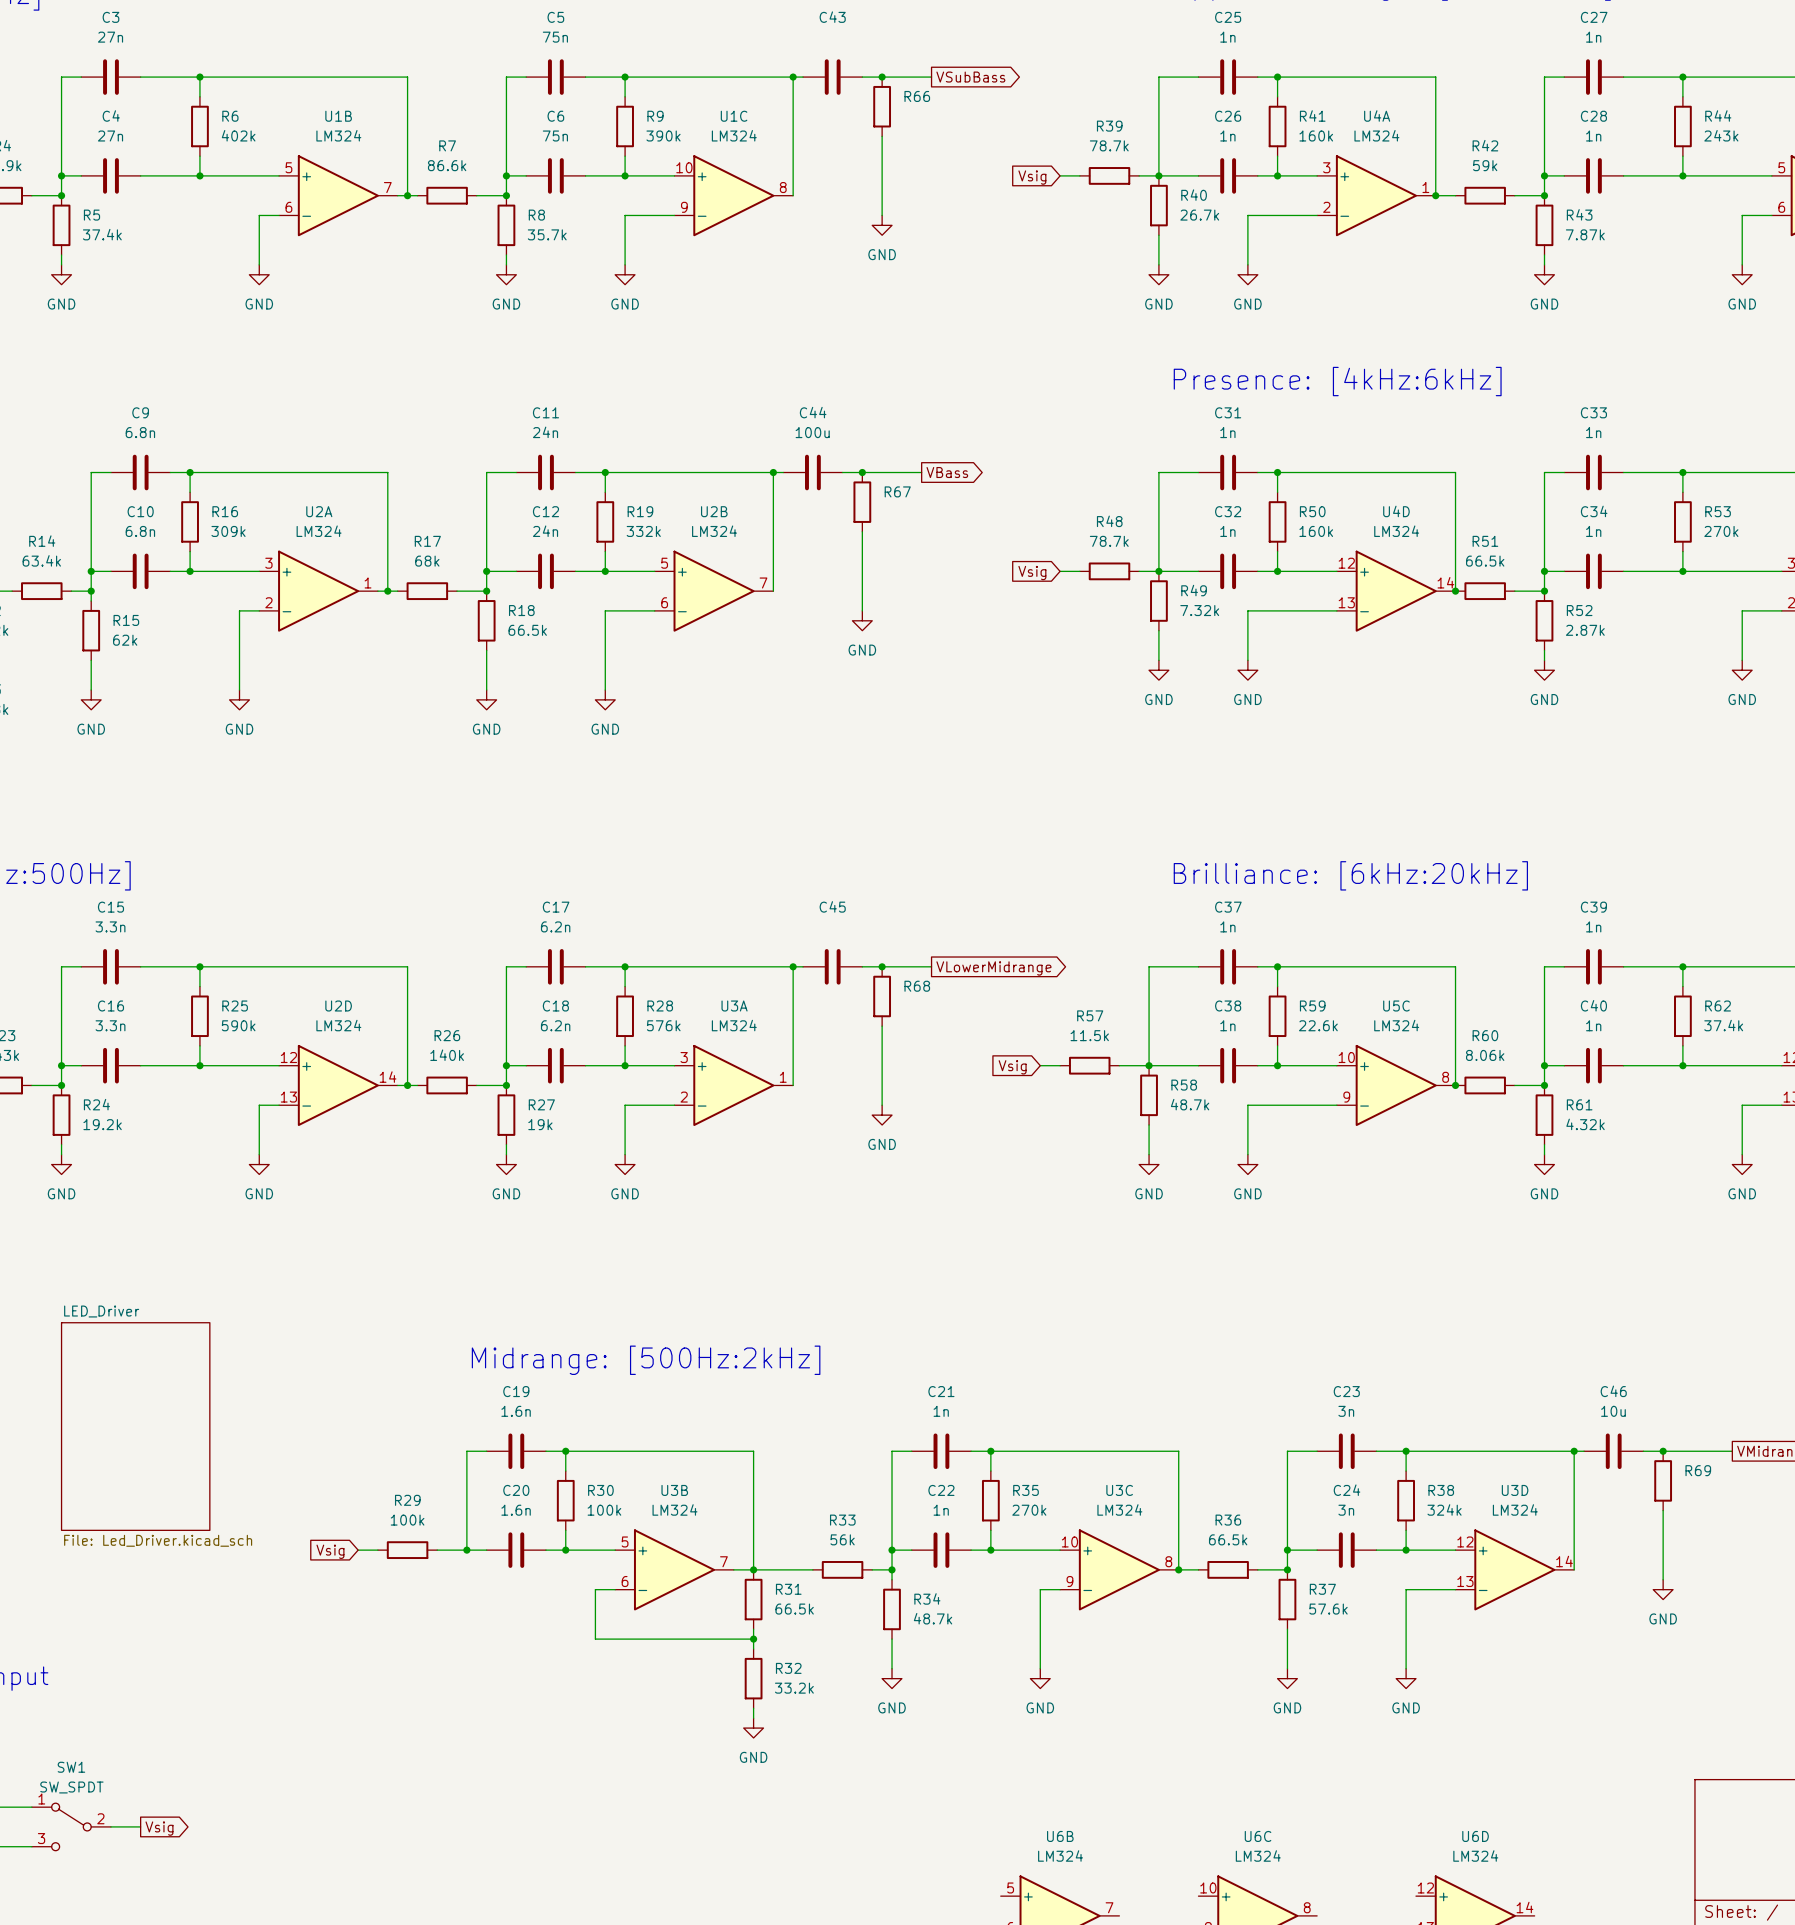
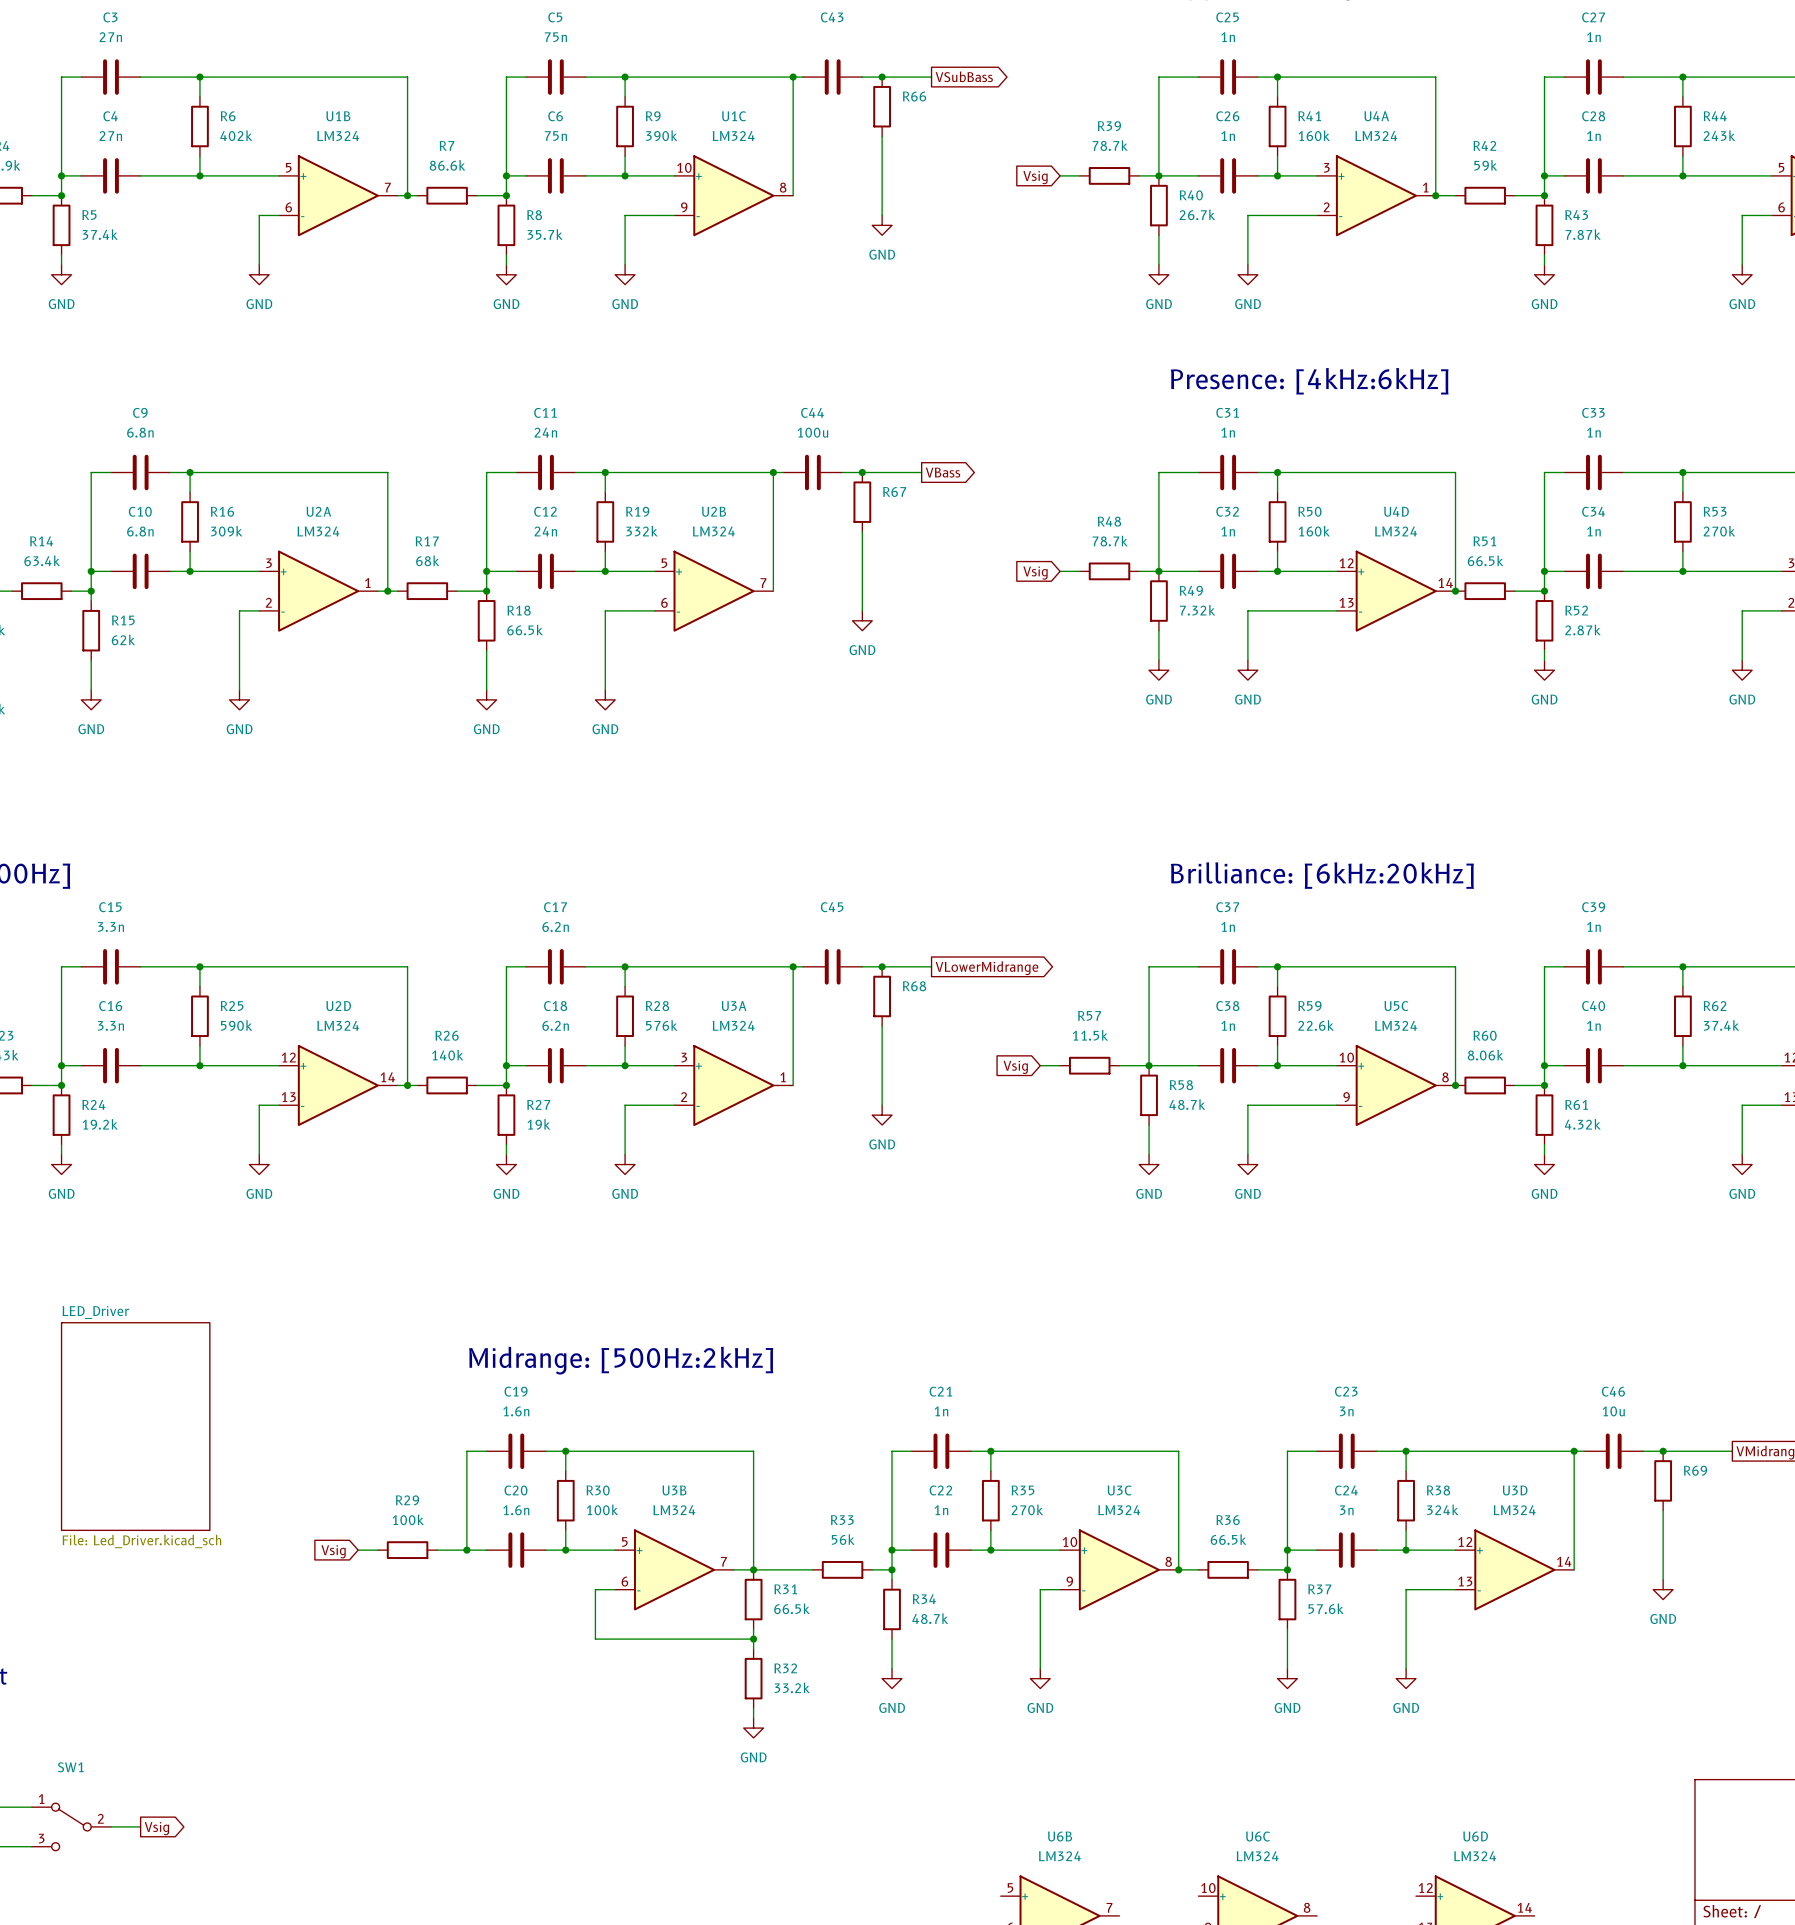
SW1 value: SW_SPDT (71, 1787) -> none

